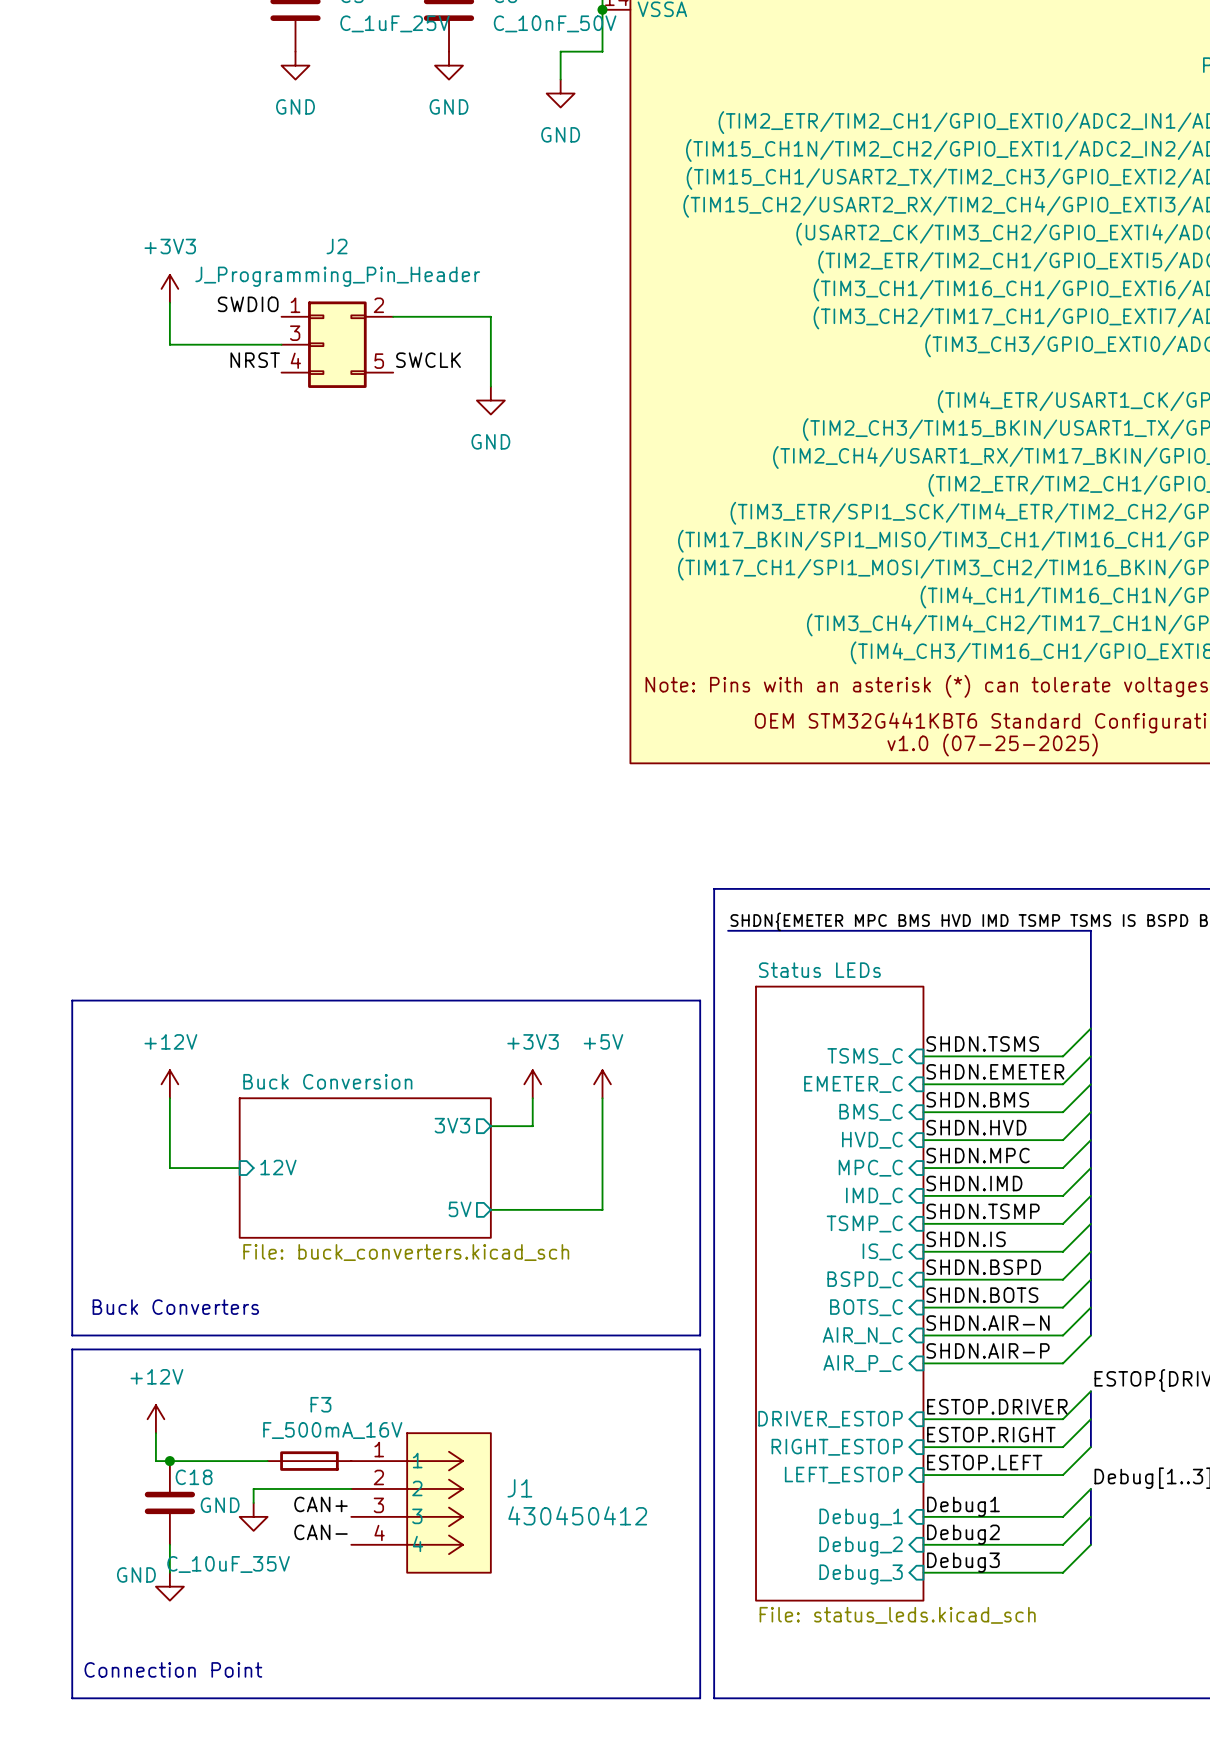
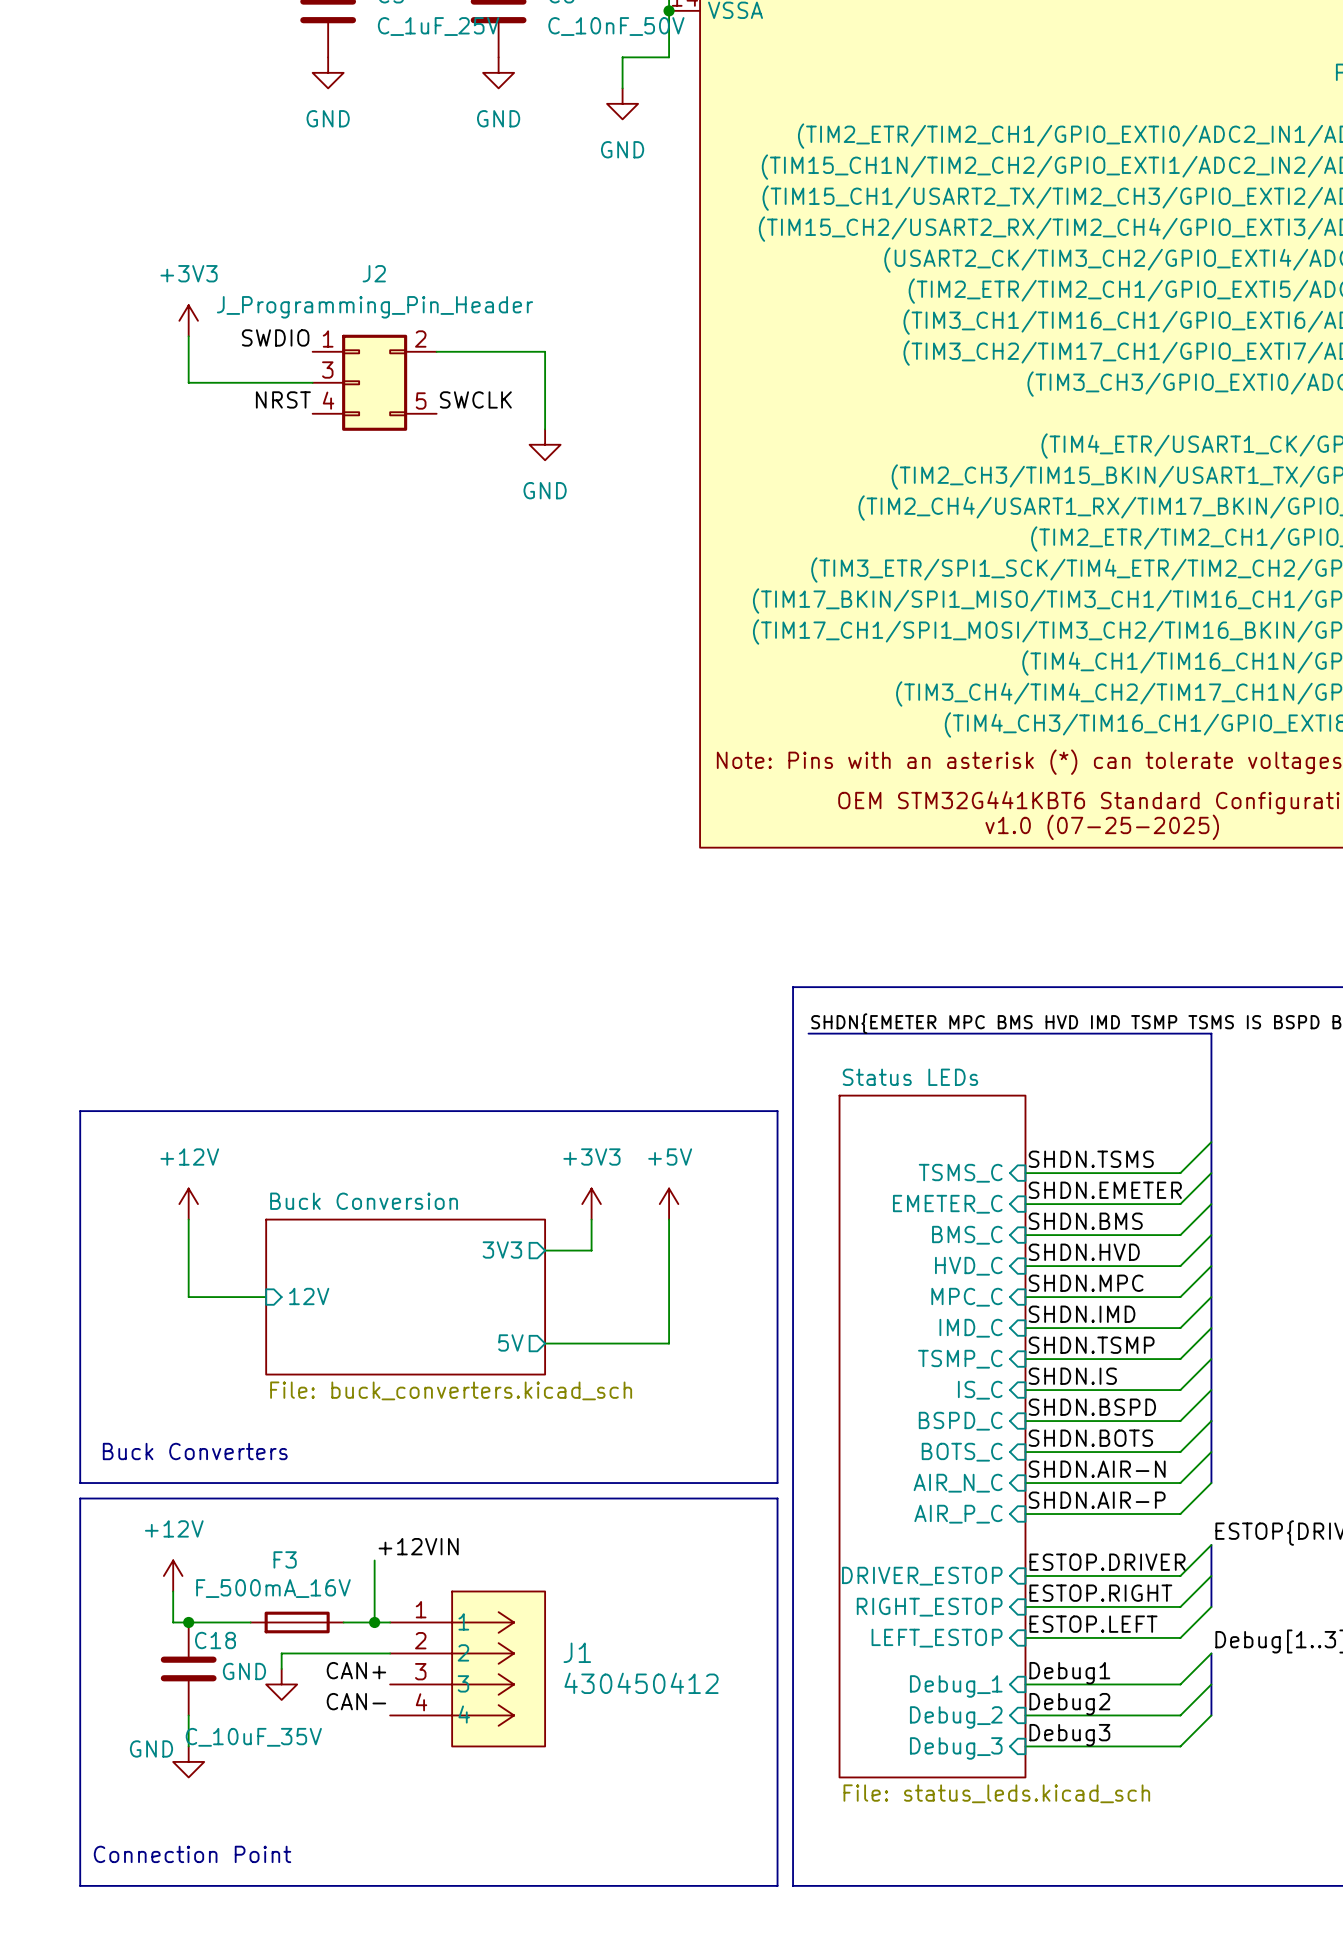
label: none -> +12VIN (418, 1546)
F3 name position: F3 (320, 1404) -> F3 (285, 1559)
wire: none -> (374, 1560) (374, 1622)
F3 value position: F_500mA_16V (332, 1430) -> F_500mA_16V (273, 1588)
F3 position: (309, 1461) -> (297, 1622)
junction: none -> (374, 1622)

